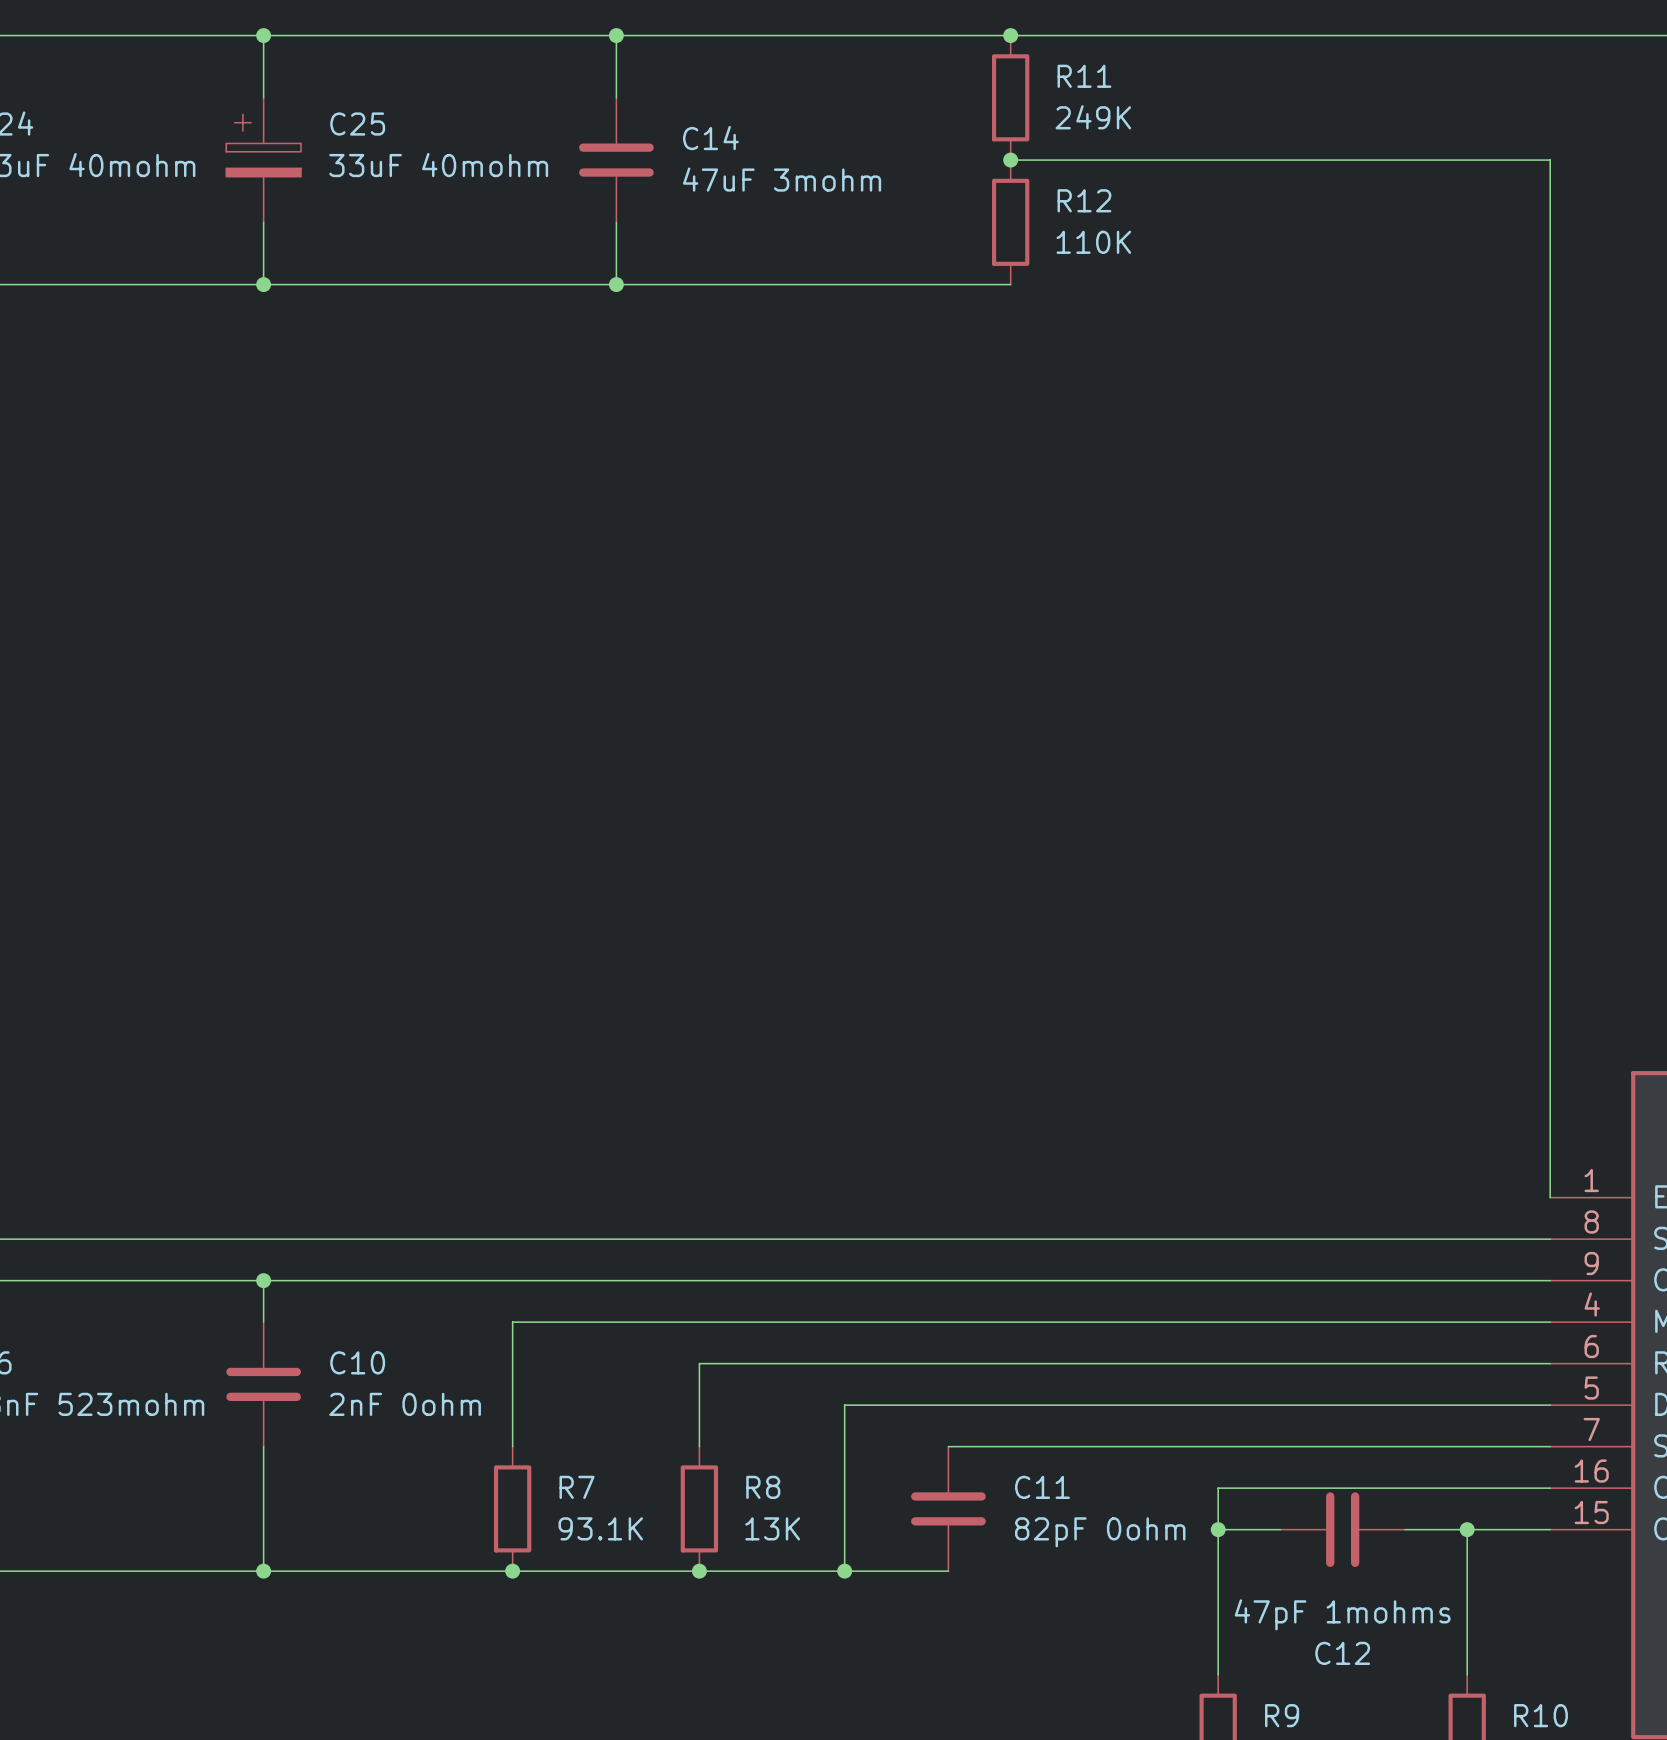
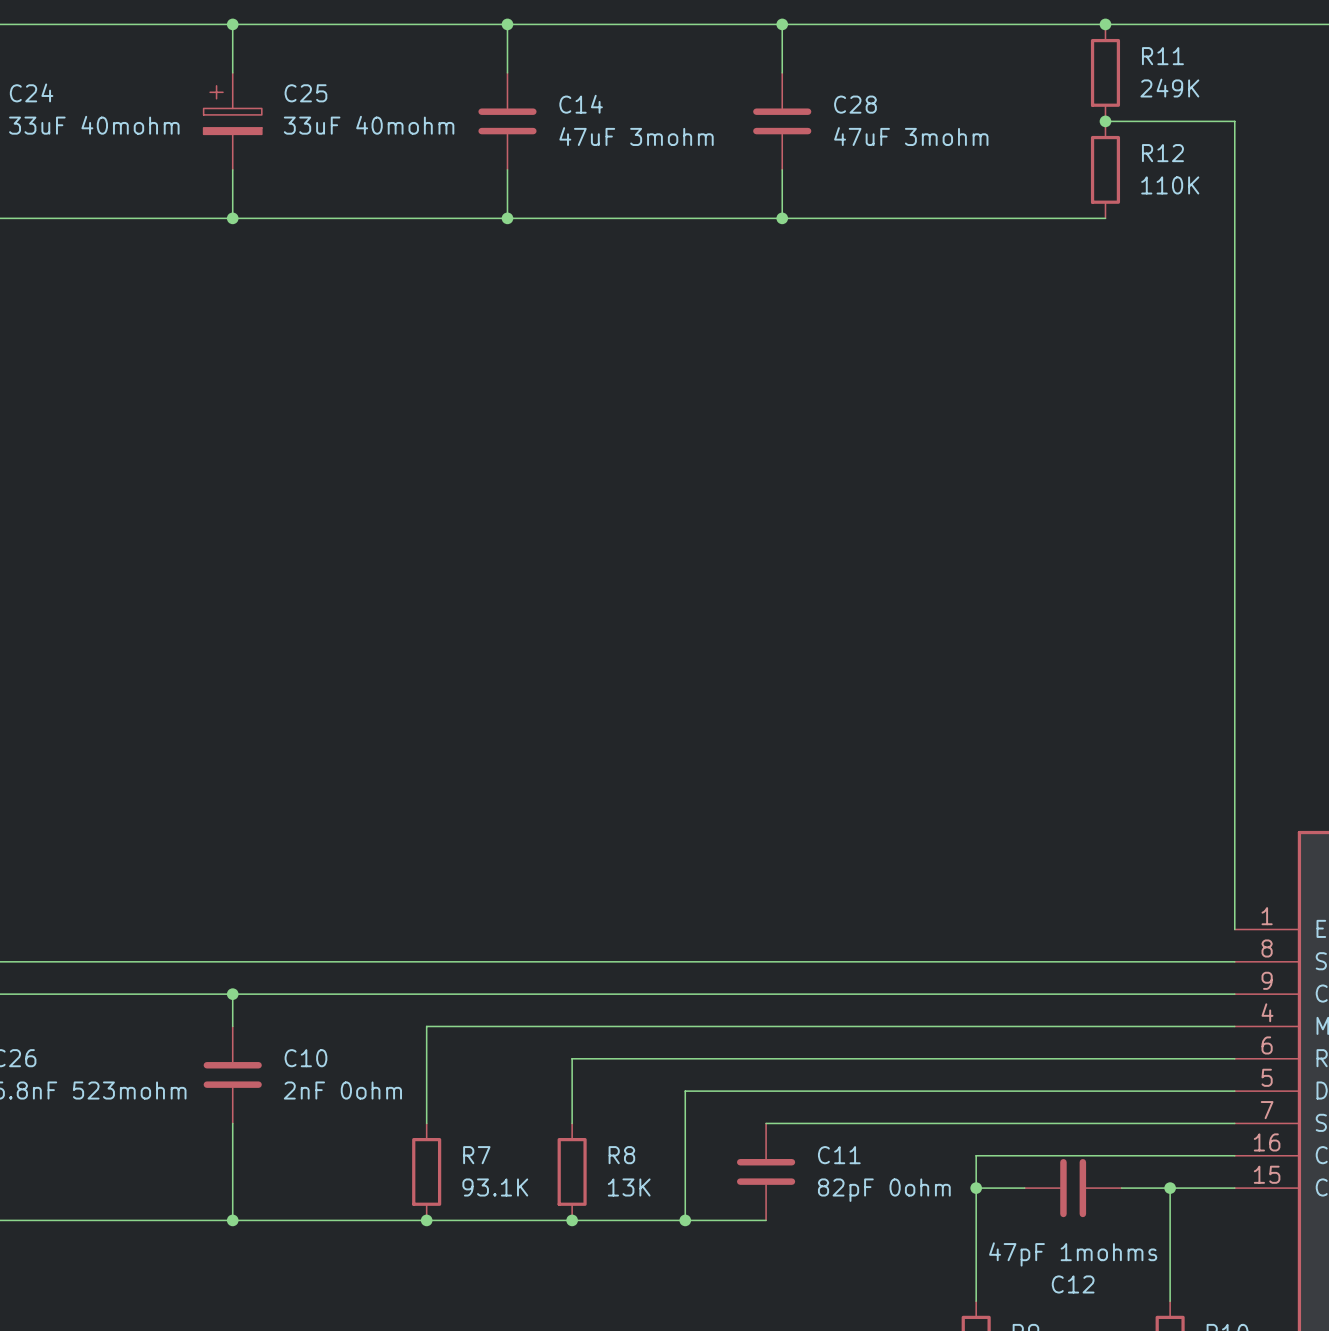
wire: none -> (782, 24) (782, 72)
junction position: (1010, 35) -> (782, 24)
junction: none -> (1105, 24)
R11 position: (1010, 97) -> (1105, 72)
C28: none -> 47uF 3mohm (782, 121)
wire: (1010, 160) (1384, 160) -> (814, 218) (1105, 218)
junction: (1010, 160) -> none
junction: none -> (1105, 121)
wire: none -> (782, 169) (782, 218)
R12 position: (1010, 222) -> (1105, 169)
junction: none -> (782, 218)

